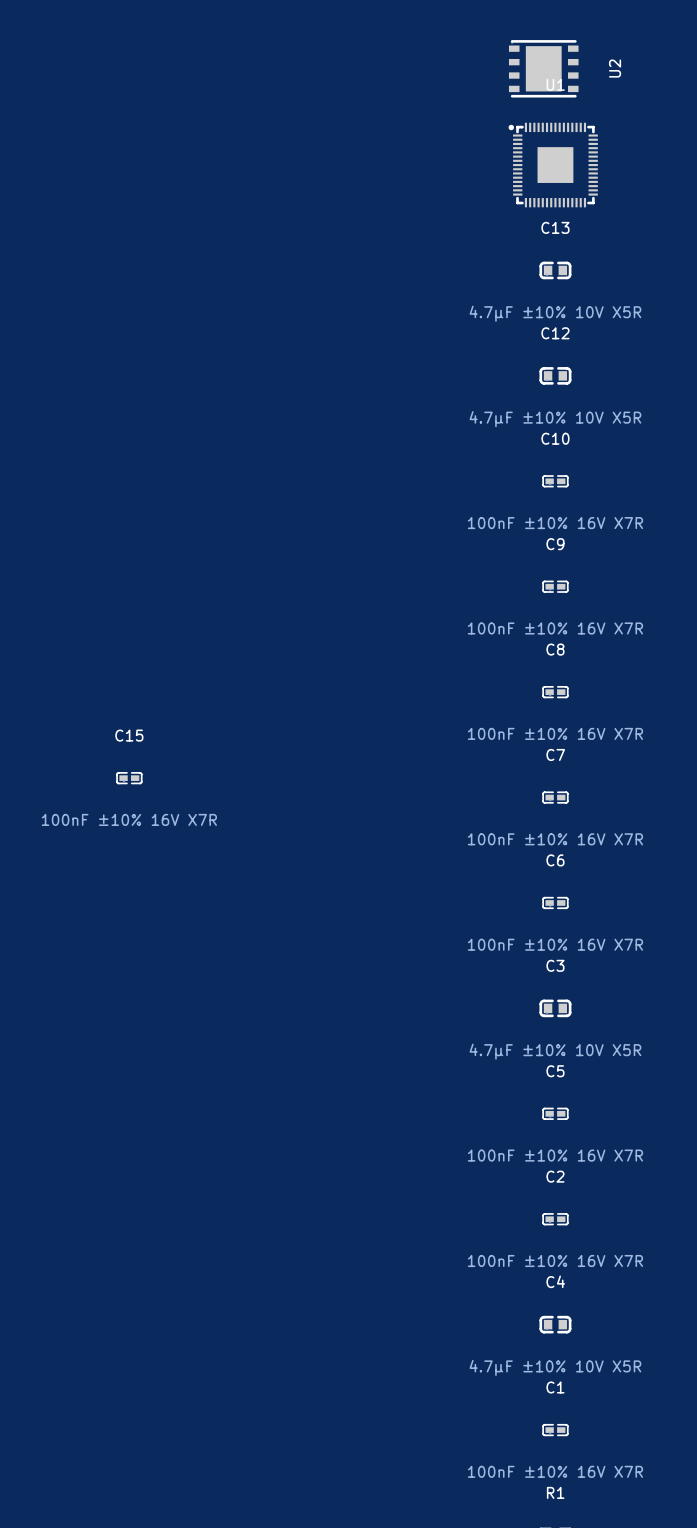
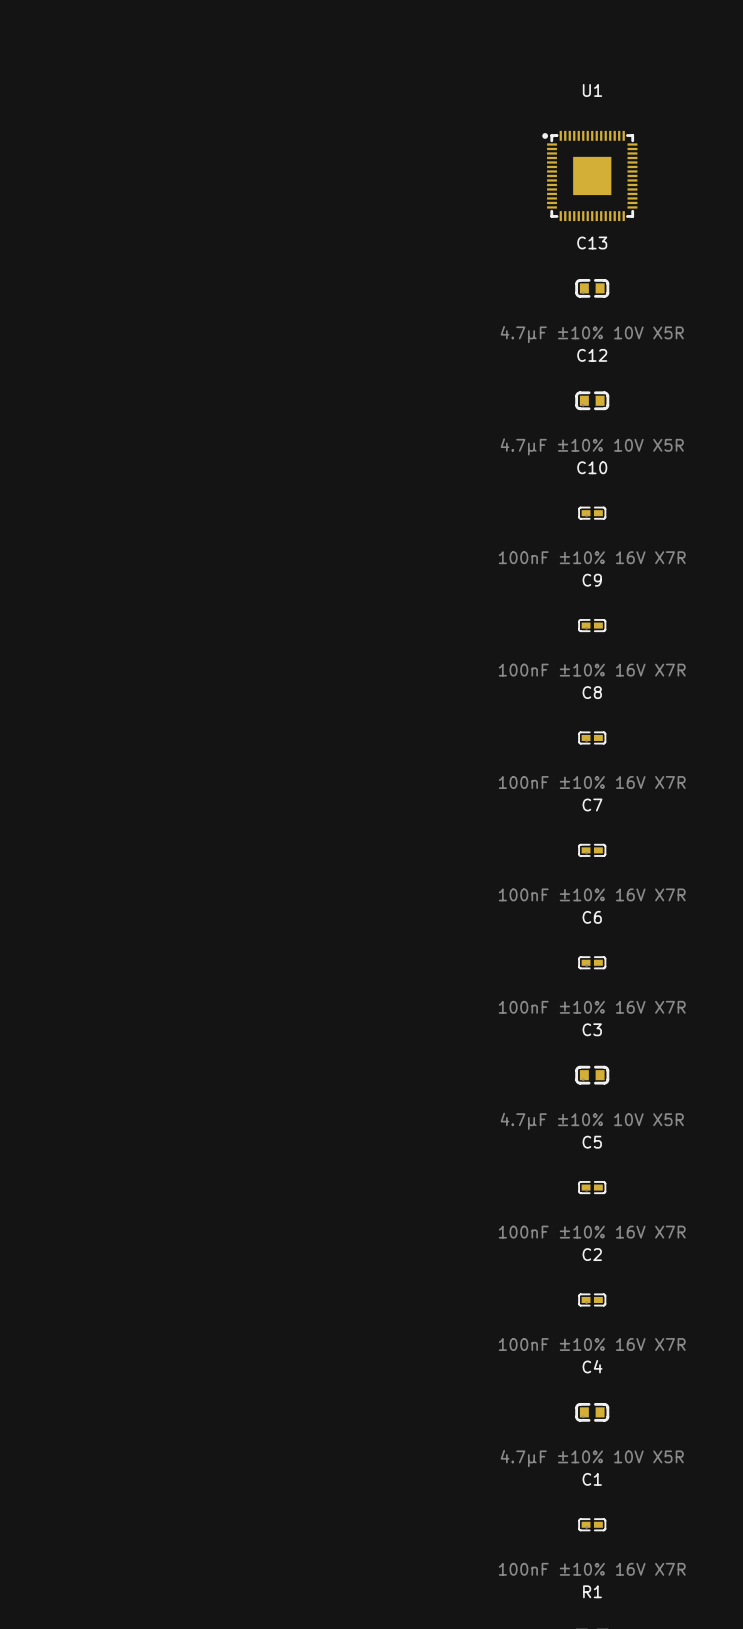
U2: (542, 67) -> none
C15: 100nF ±10% 16V X7R (129, 778) -> none

